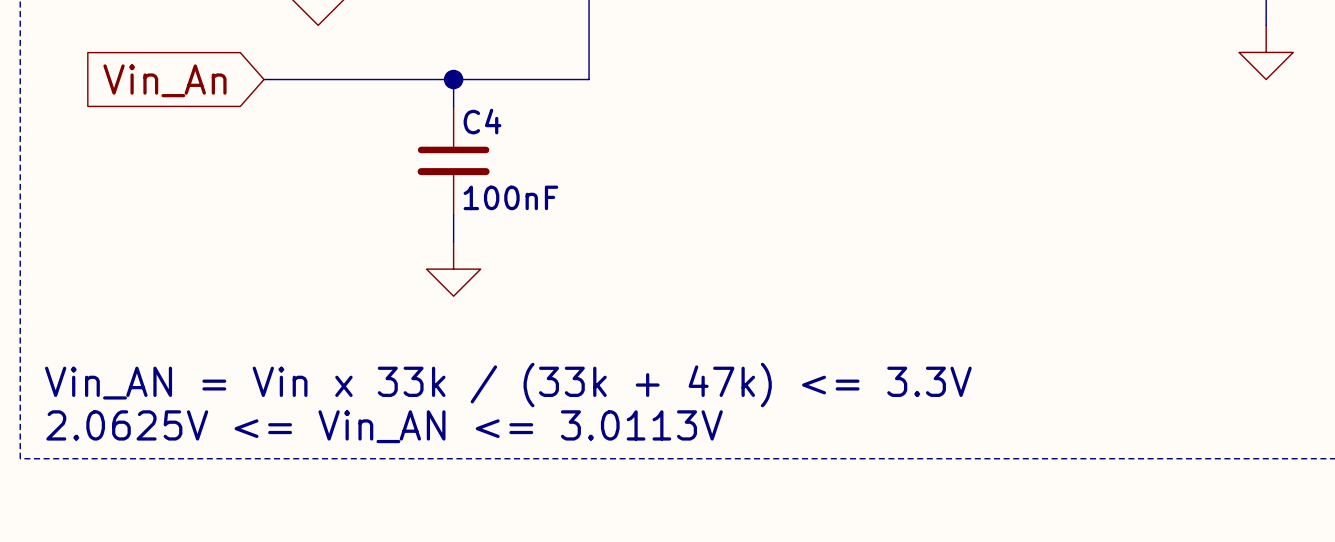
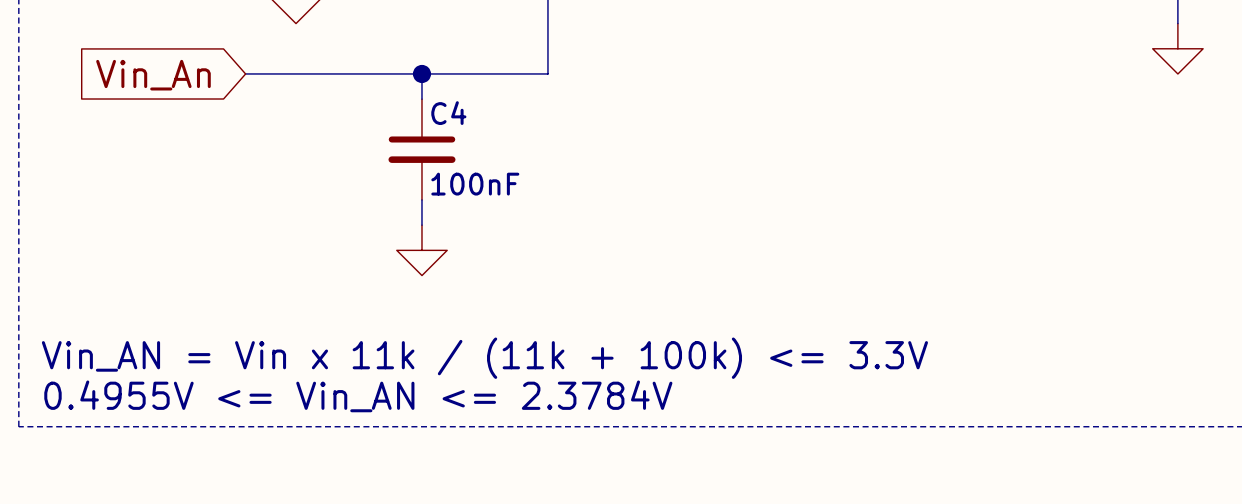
text: Vin_AN = Vin x 33k / (33k + 47k) <= 3.3V (508, 385) -> Vin_AN = Vin x 11k / (11k + 100k) <= 3.3V (484, 358)
text: 2.0625V <= Vin_AN <= 3.0113V (384, 426) -> 0.4955V <= Vin_AN <= 2.3784V (358, 396)

